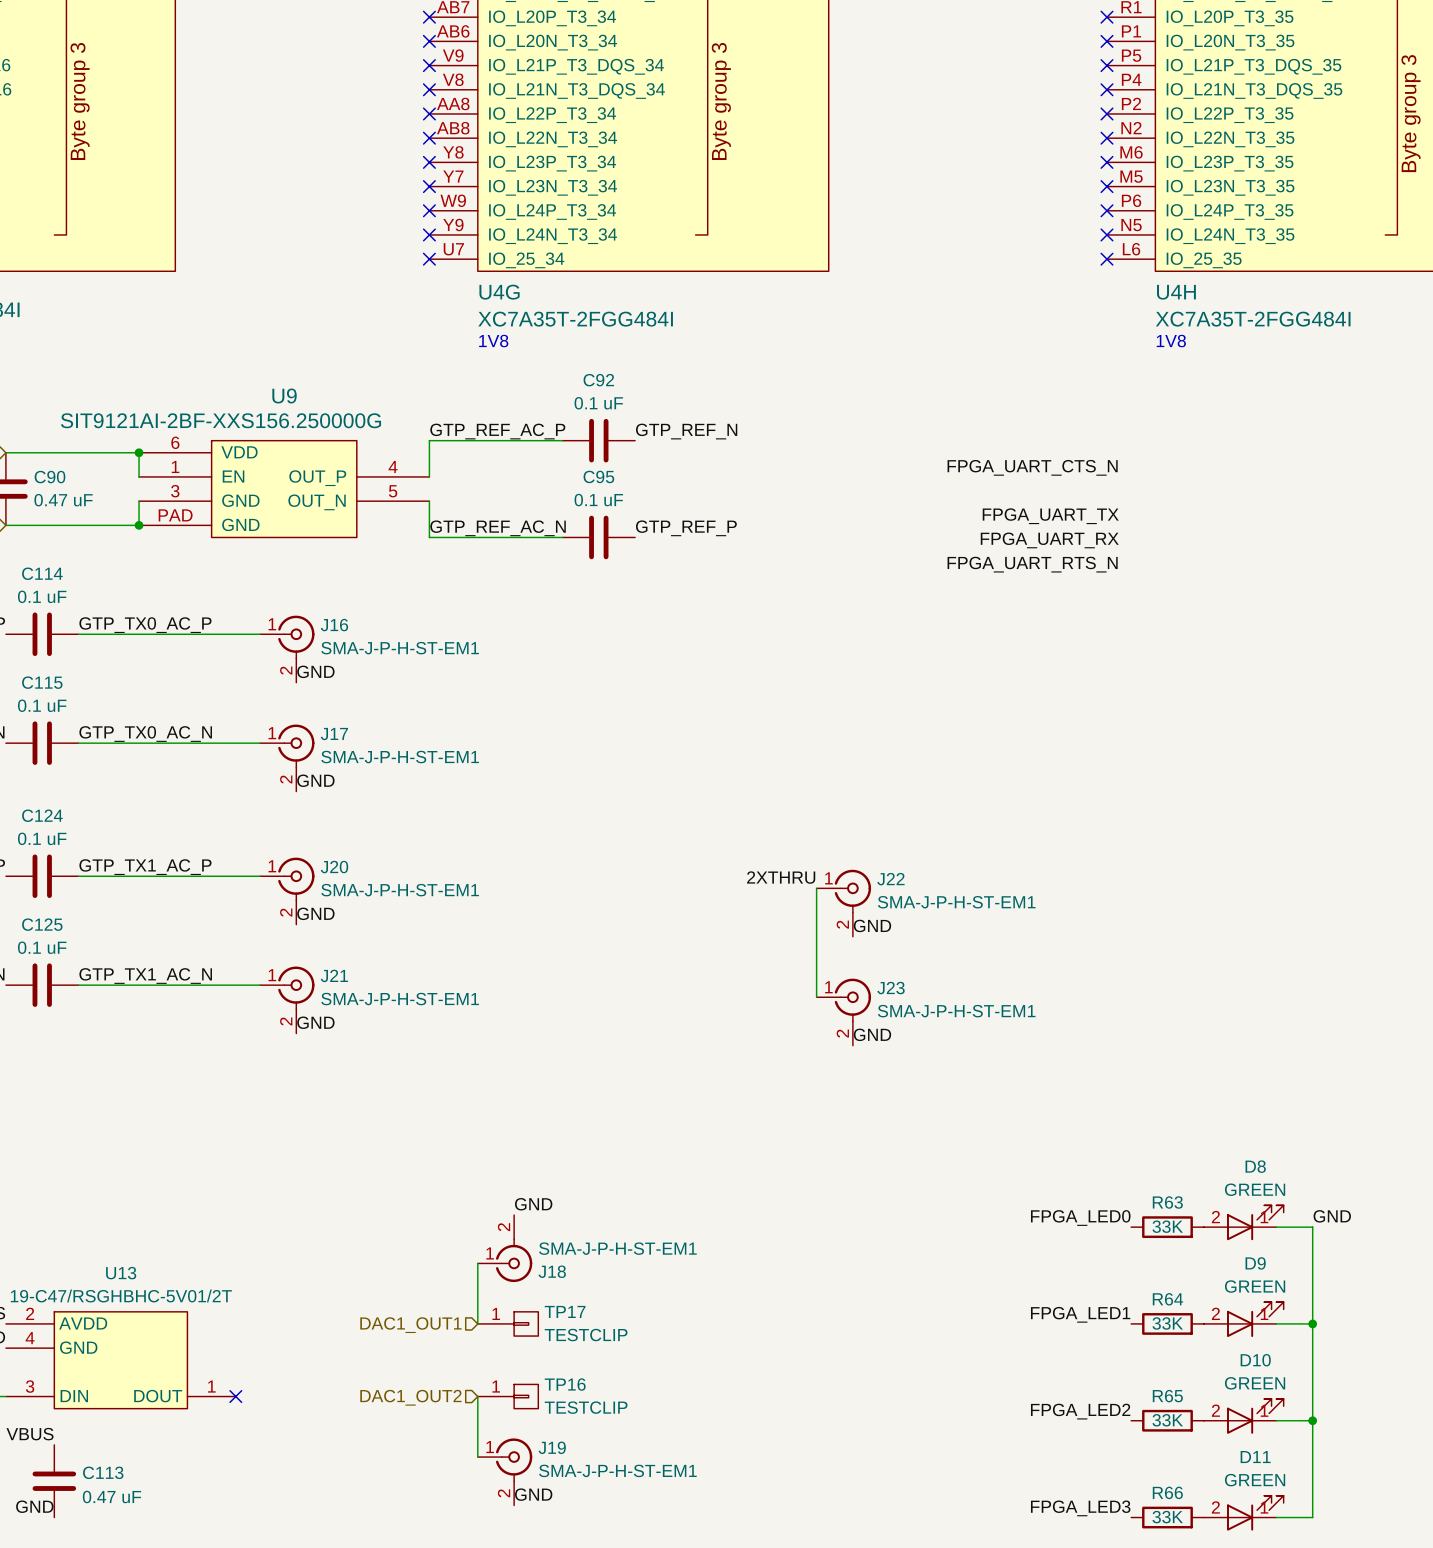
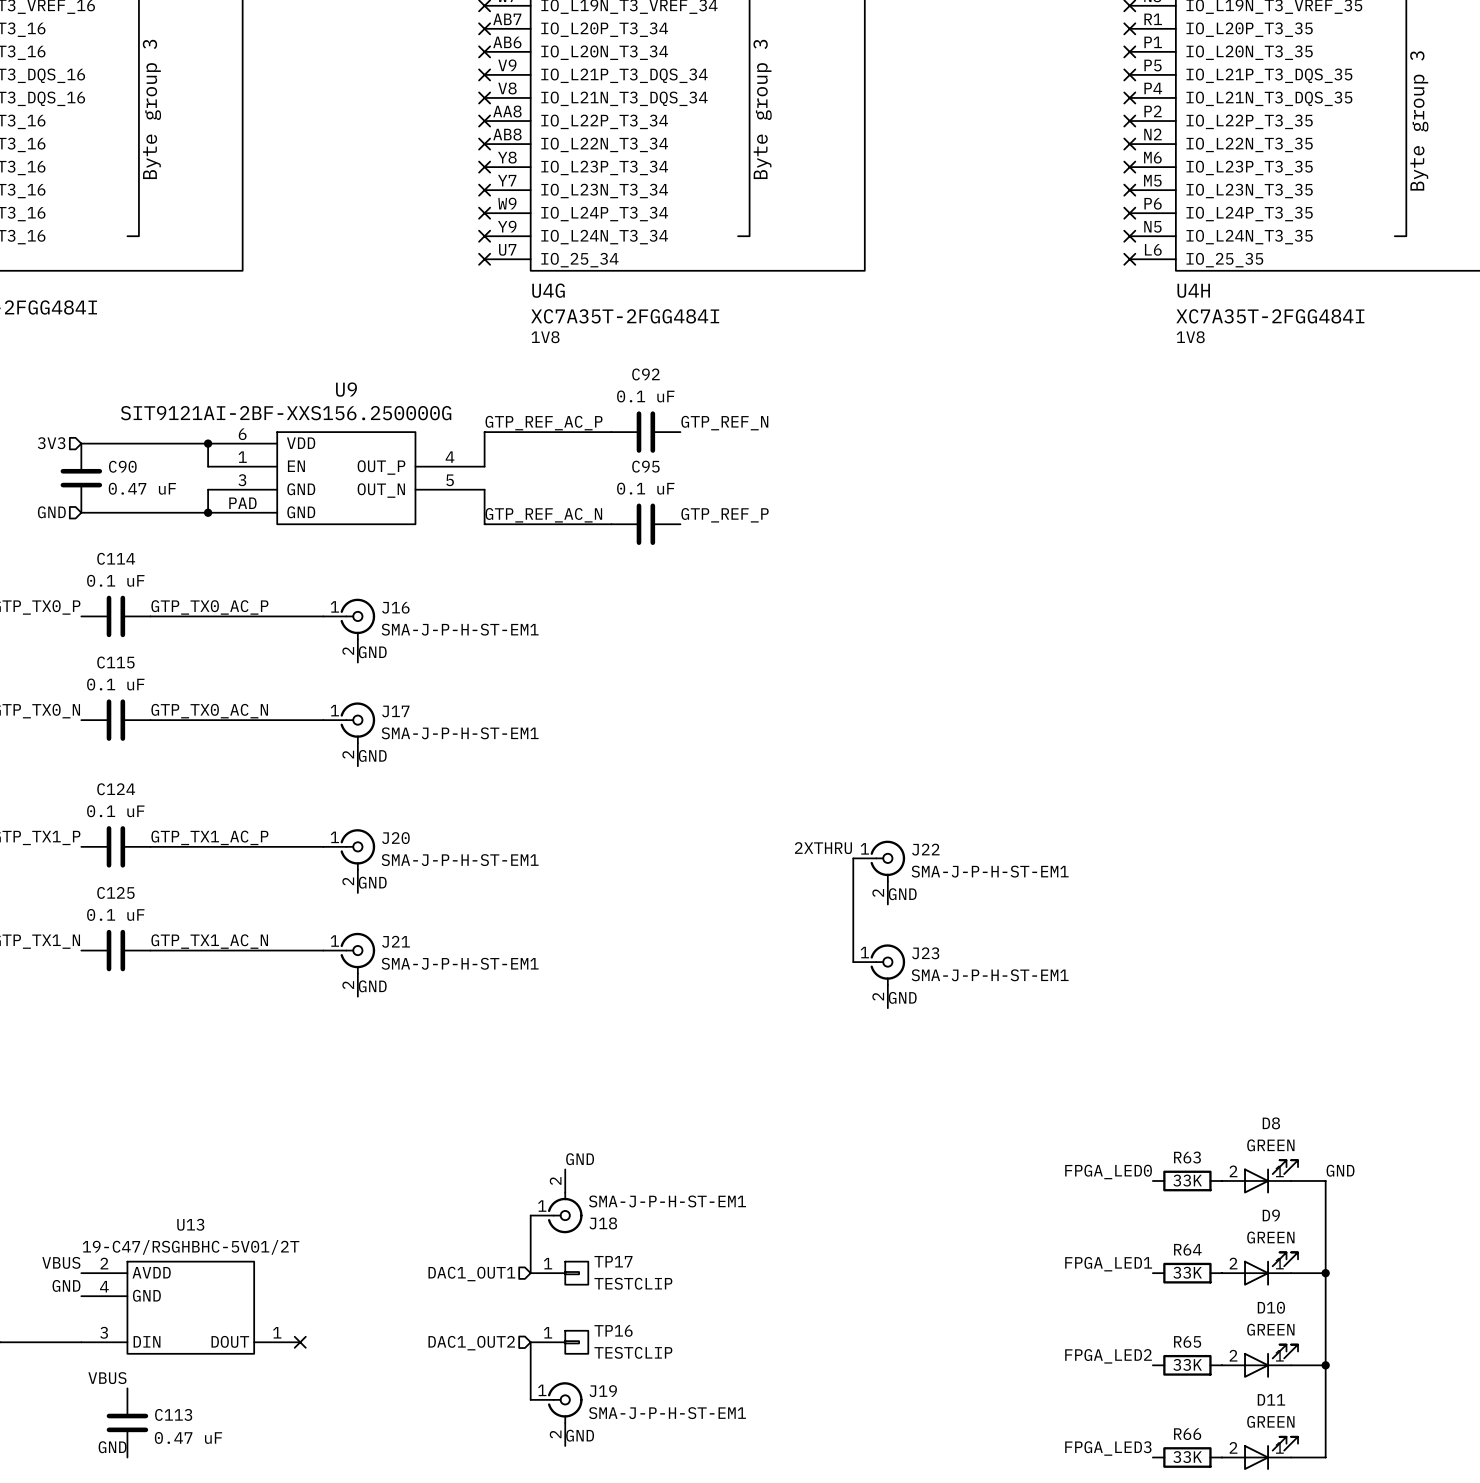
label: FPGA_UART_CTS_N (1032, 467) -> none
label: FPGA_UART_TX (1050, 516) -> none
label: FPGA_UART_RX (1049, 540) -> none
label: FPGA_UART_RTS_N (1032, 564) -> none

